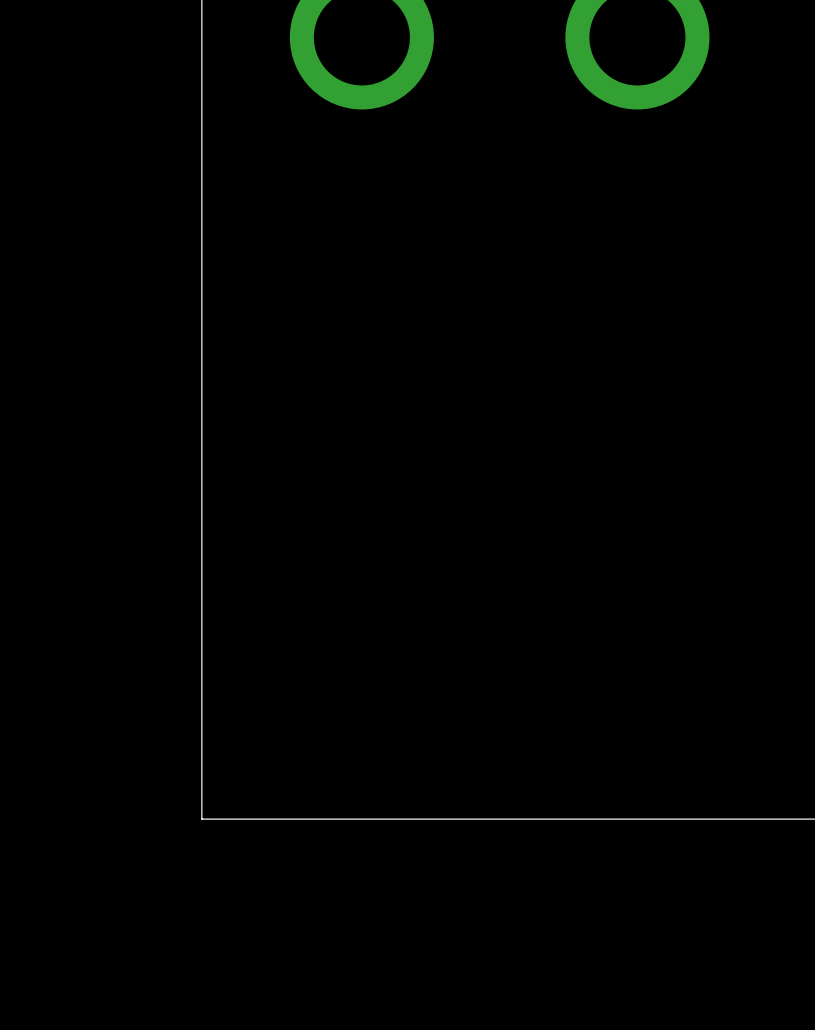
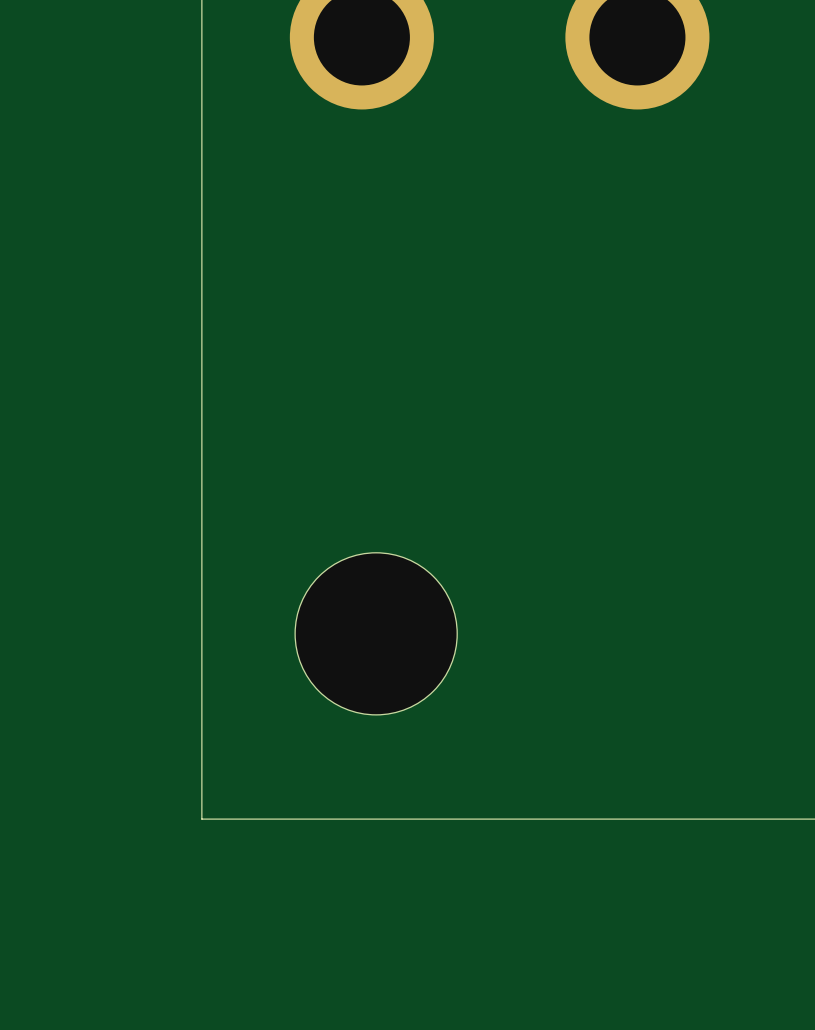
hole: none -> (376, 633)

